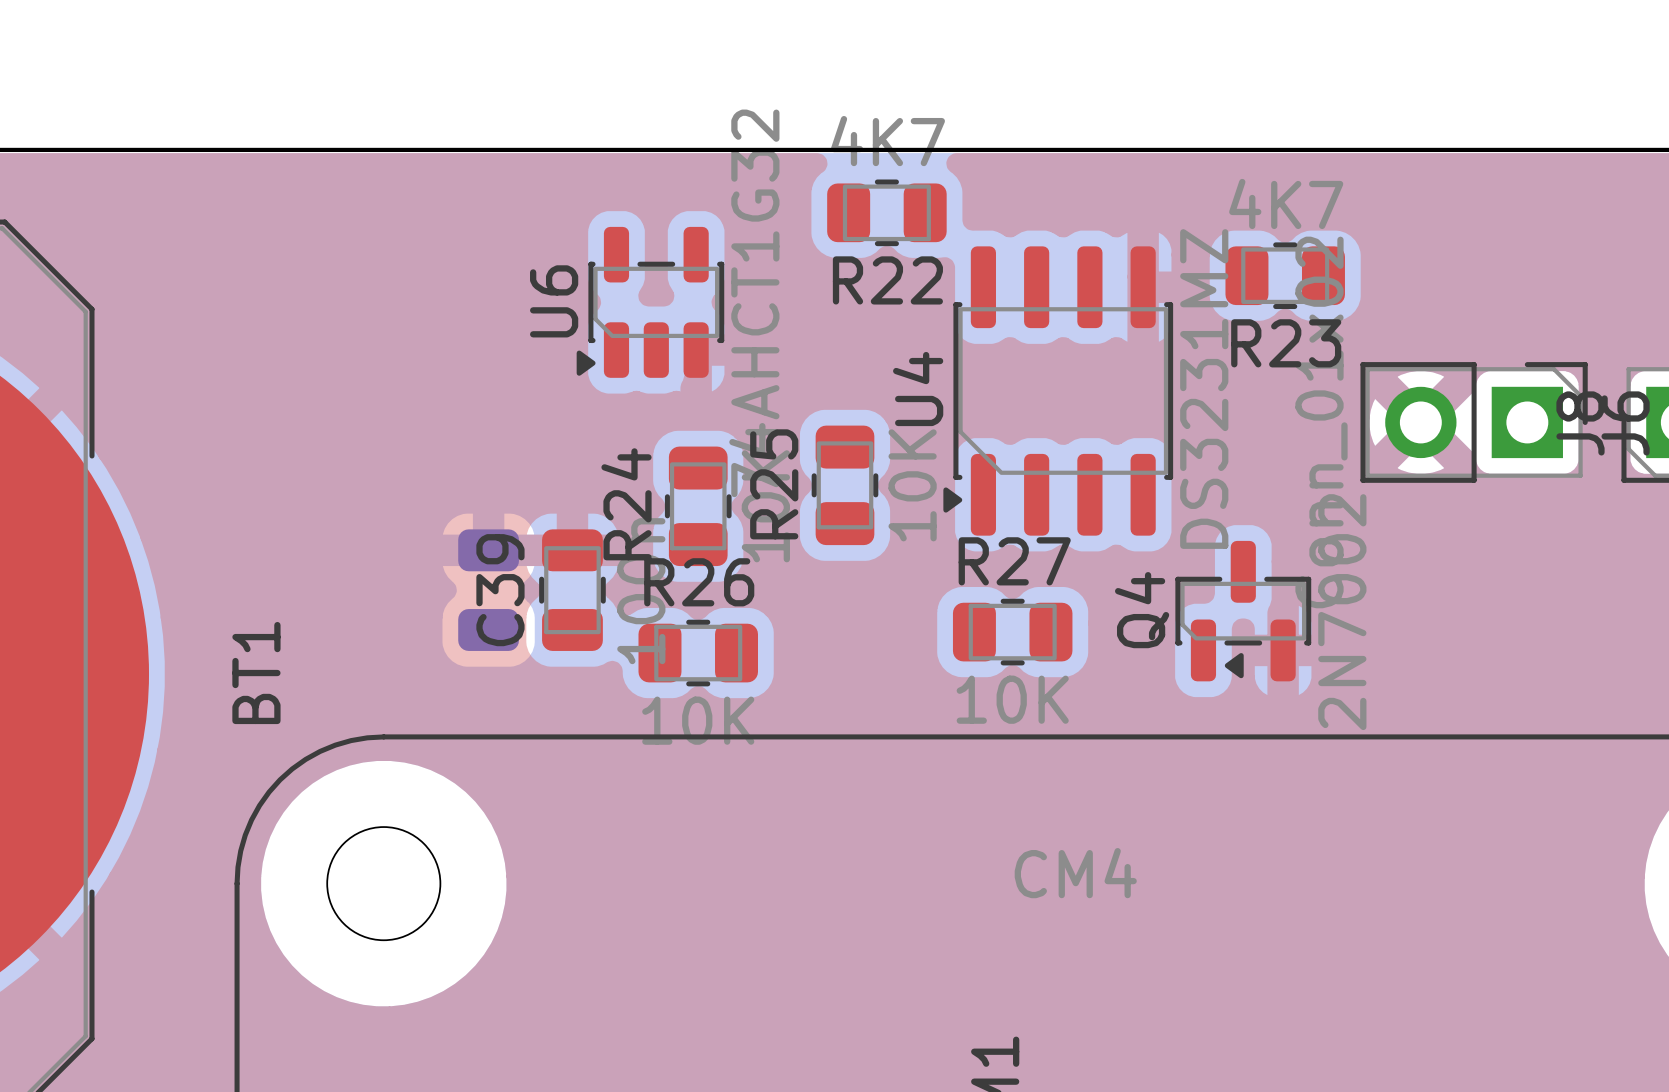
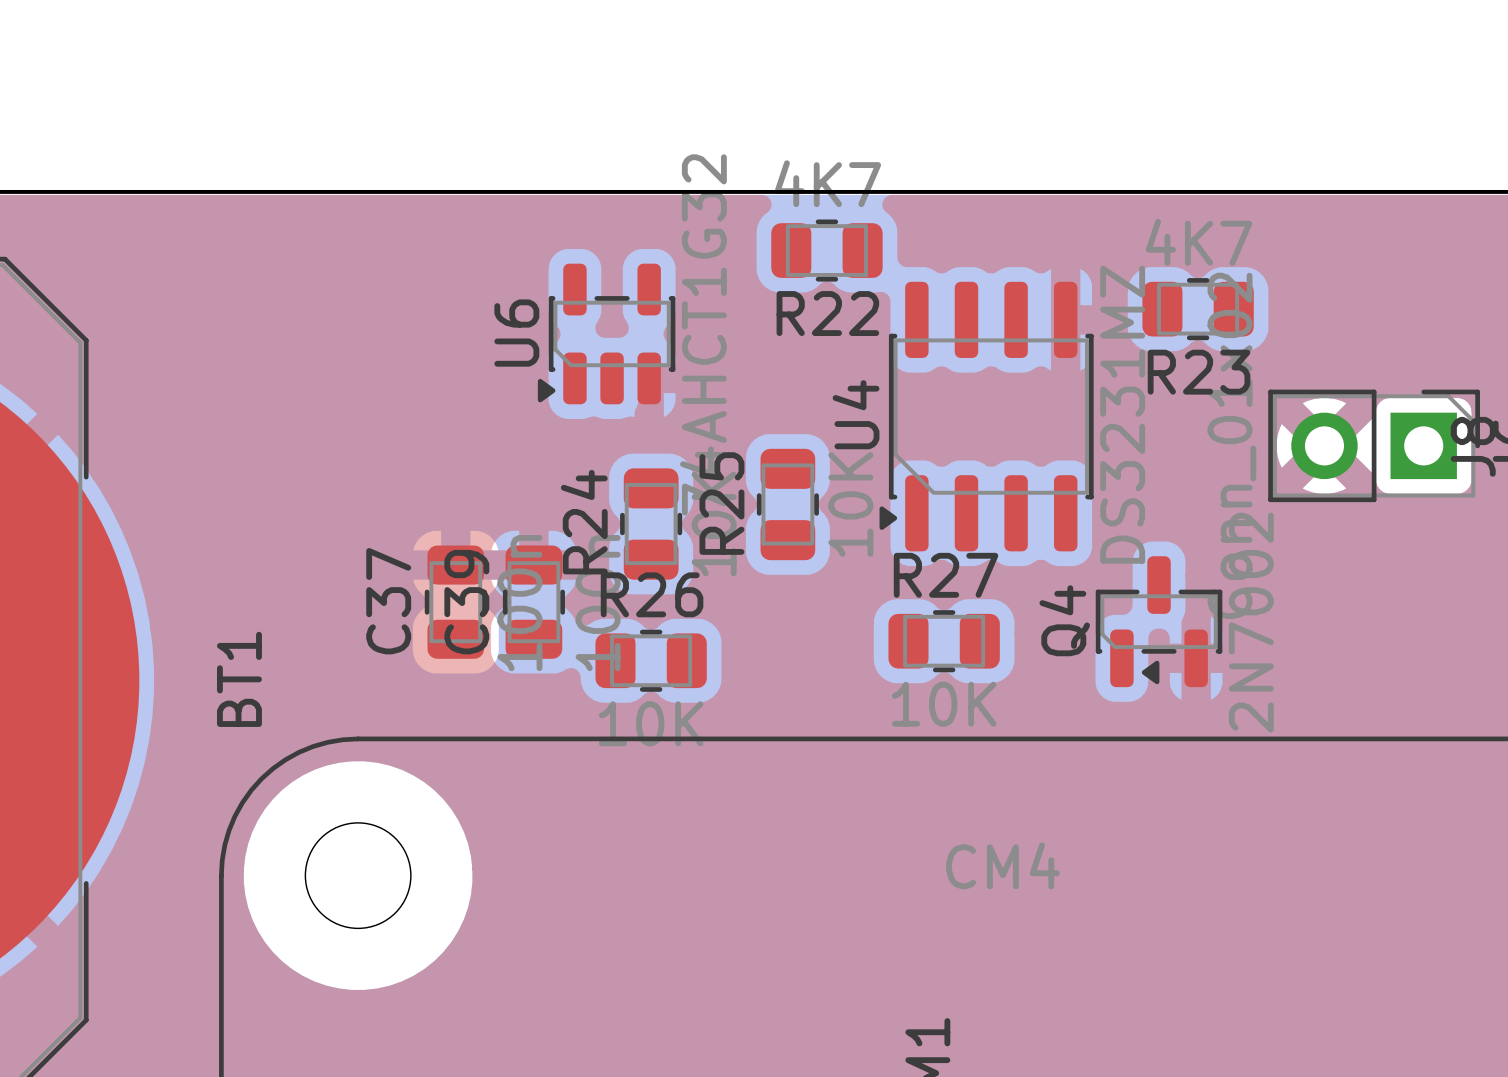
C37 side: bottom (488, 590) -> top (455, 602)

